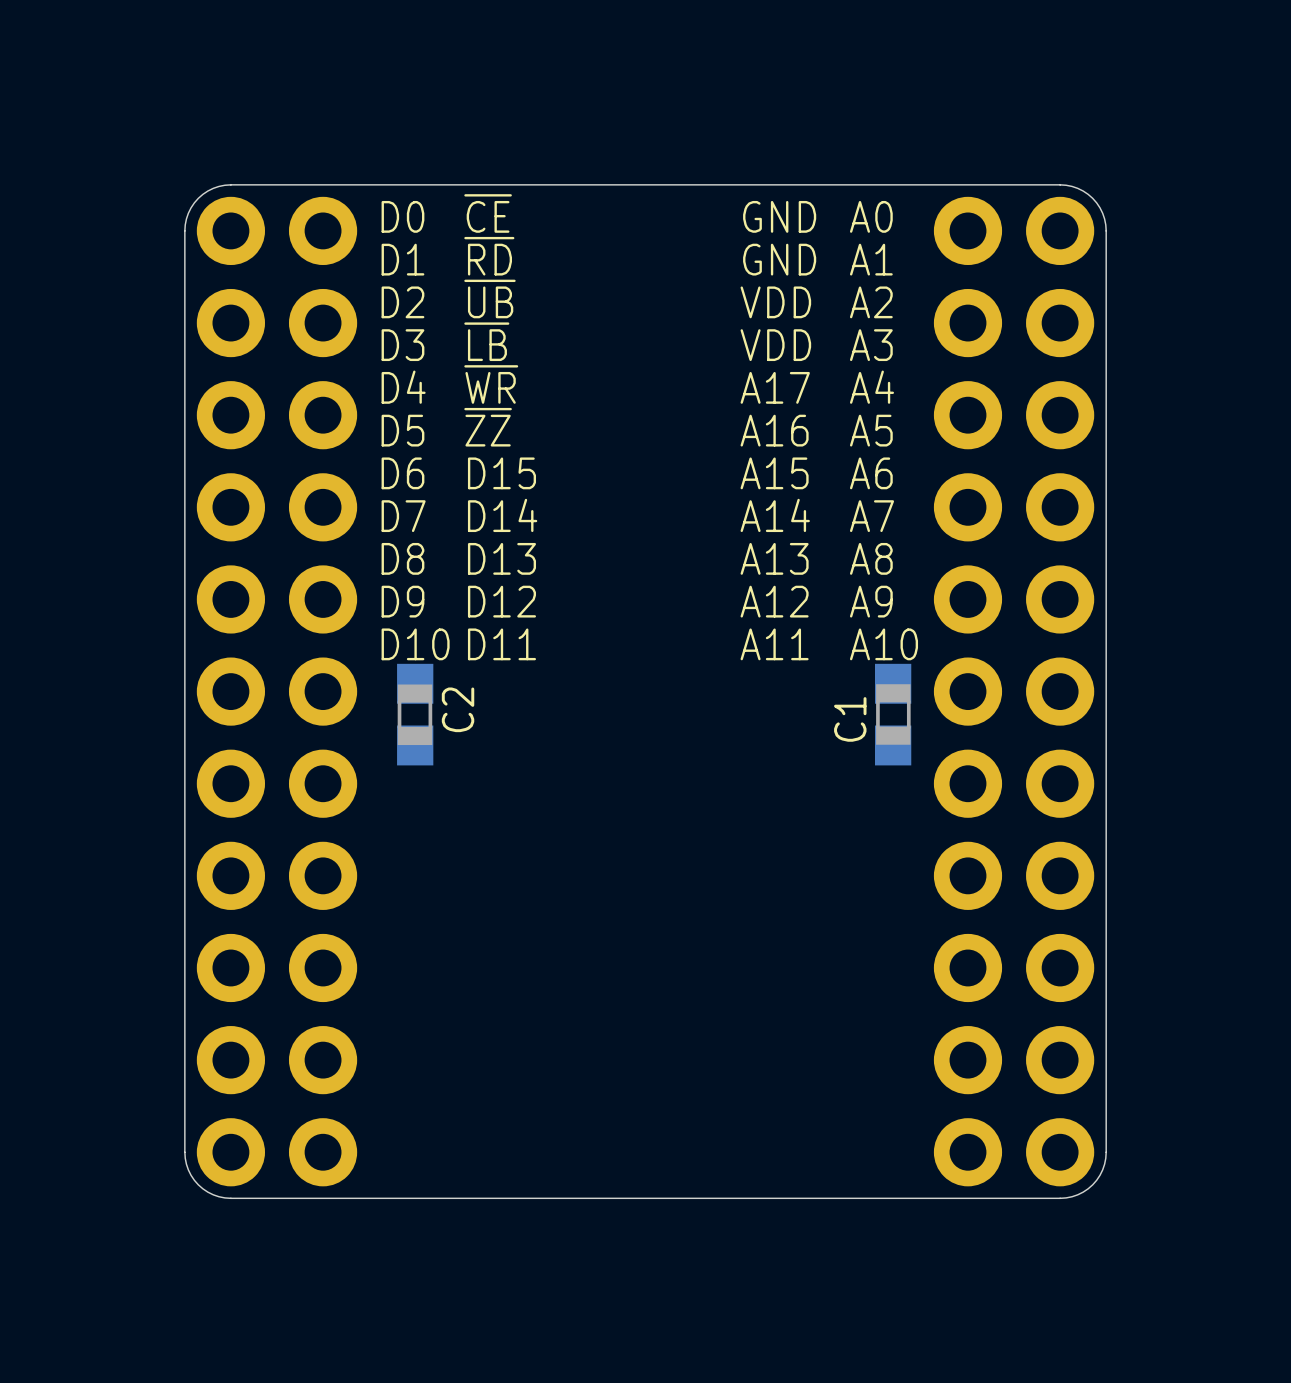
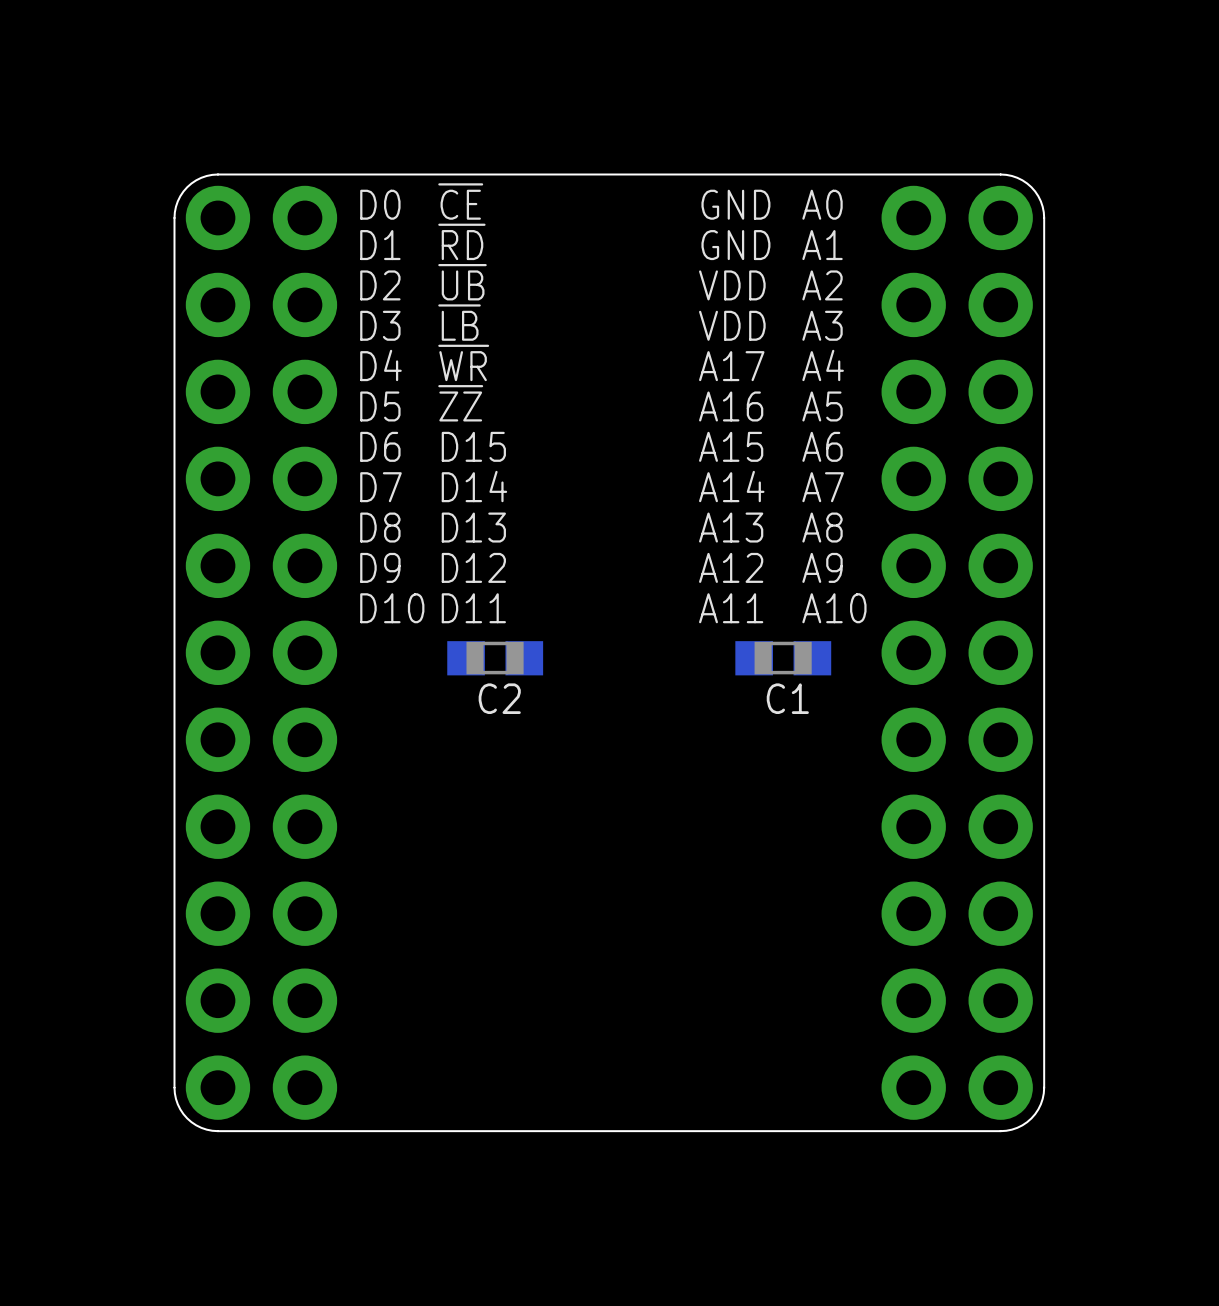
C2 rotation: 0° (415, 714) -> 90° clockwise (495, 658)
C2 position: (415, 714) -> (495, 658)
C1 rotation: 0° (893, 714) -> 90° clockwise (783, 658)
C1 position: (893, 714) -> (783, 658)

